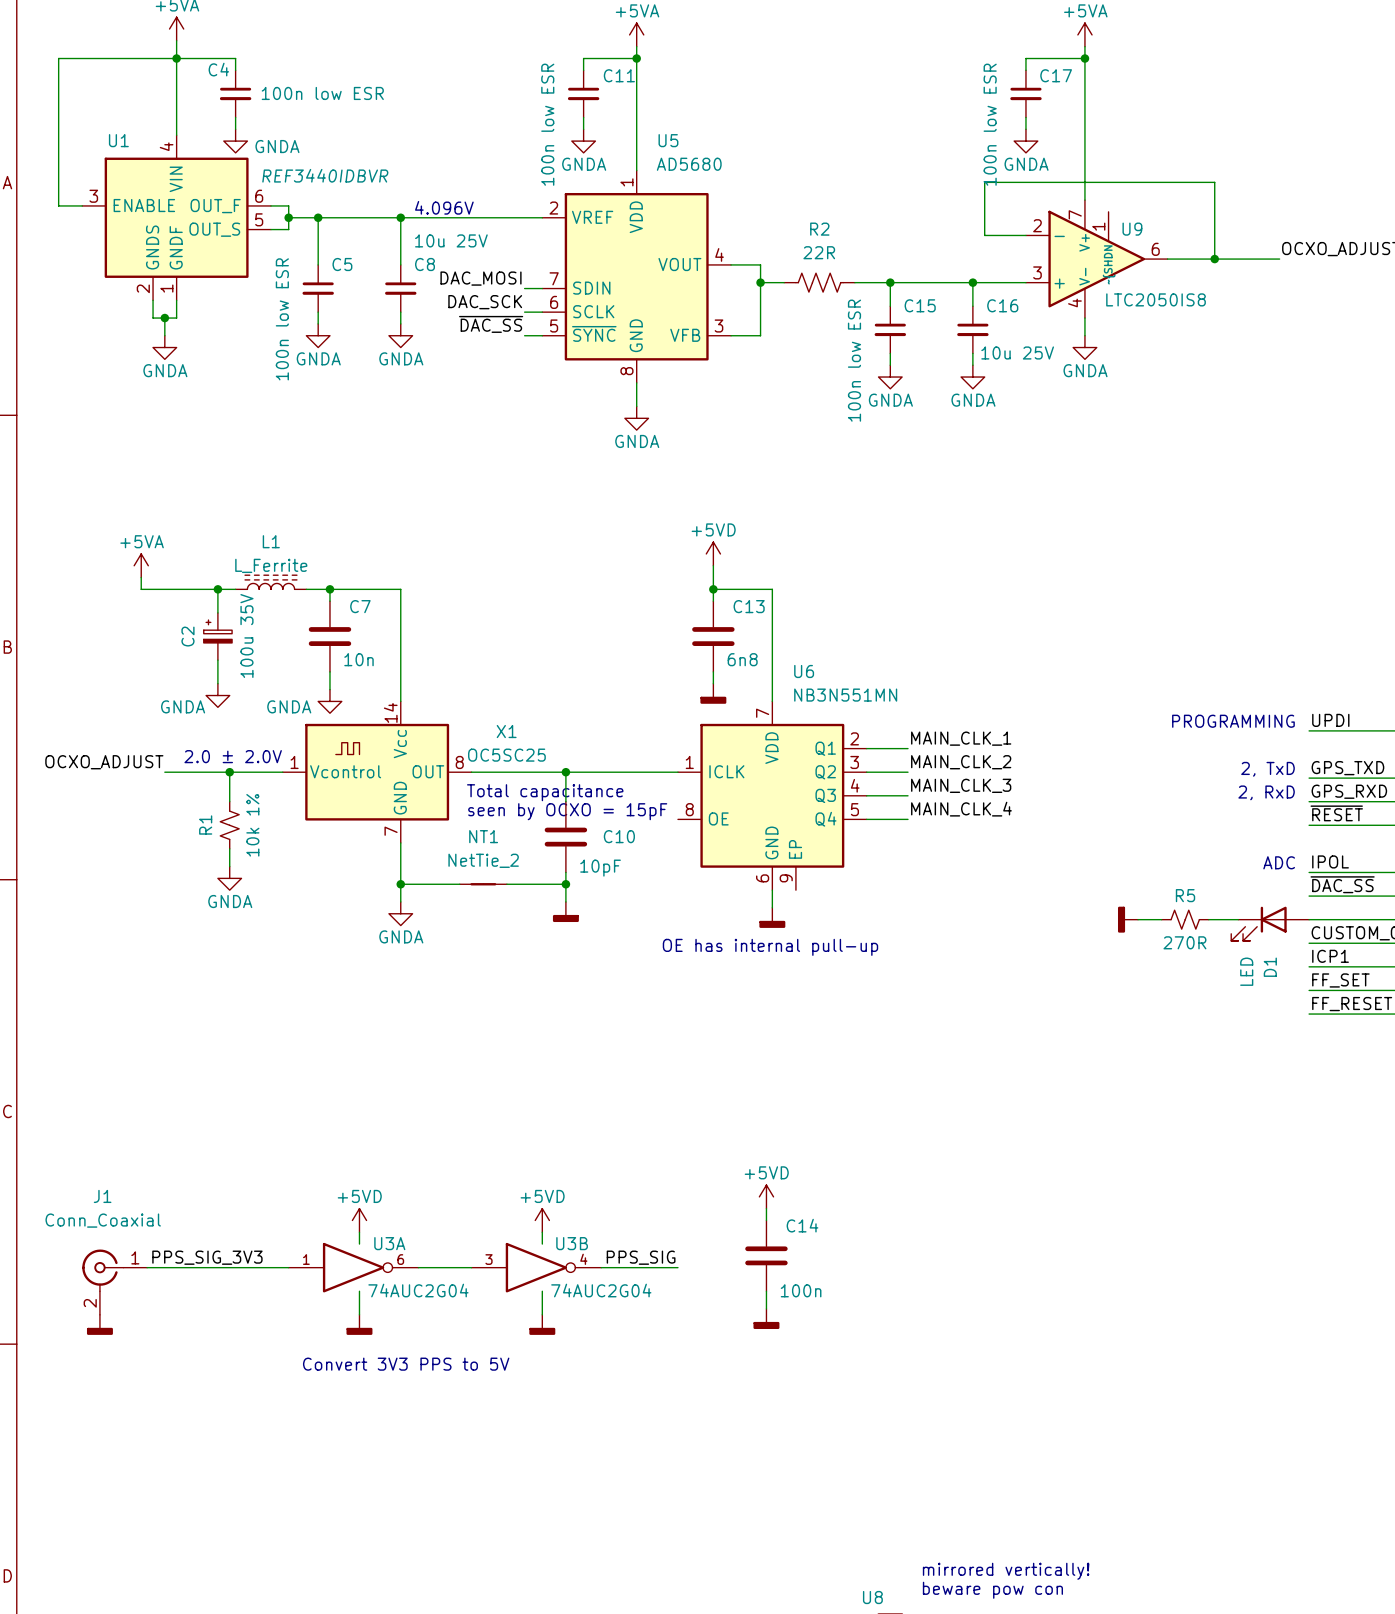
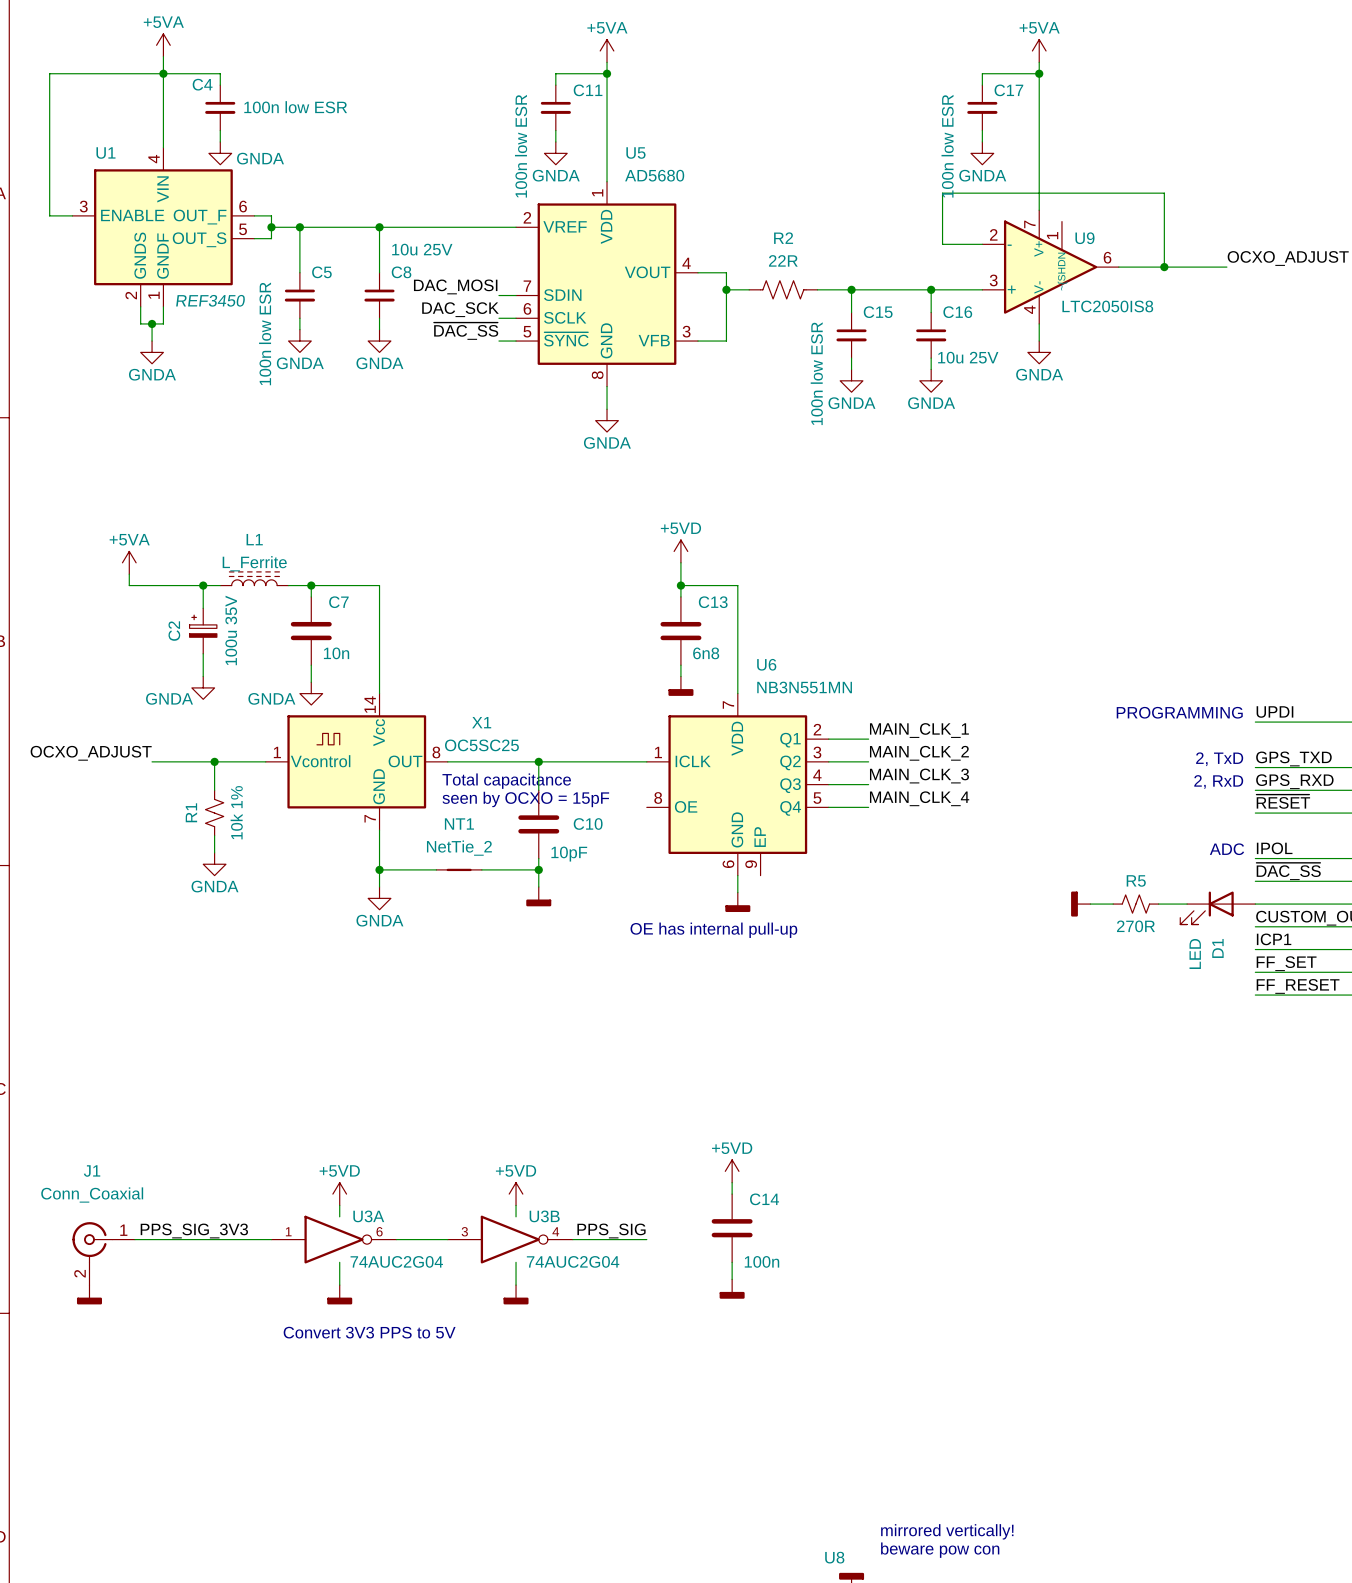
U1 value: REF3440IDBVR (325, 175) -> REF3450 (210, 300)
text: 4.096V (444, 207) -> none
text: 2.0 ± 2.0V (233, 756) -> none

